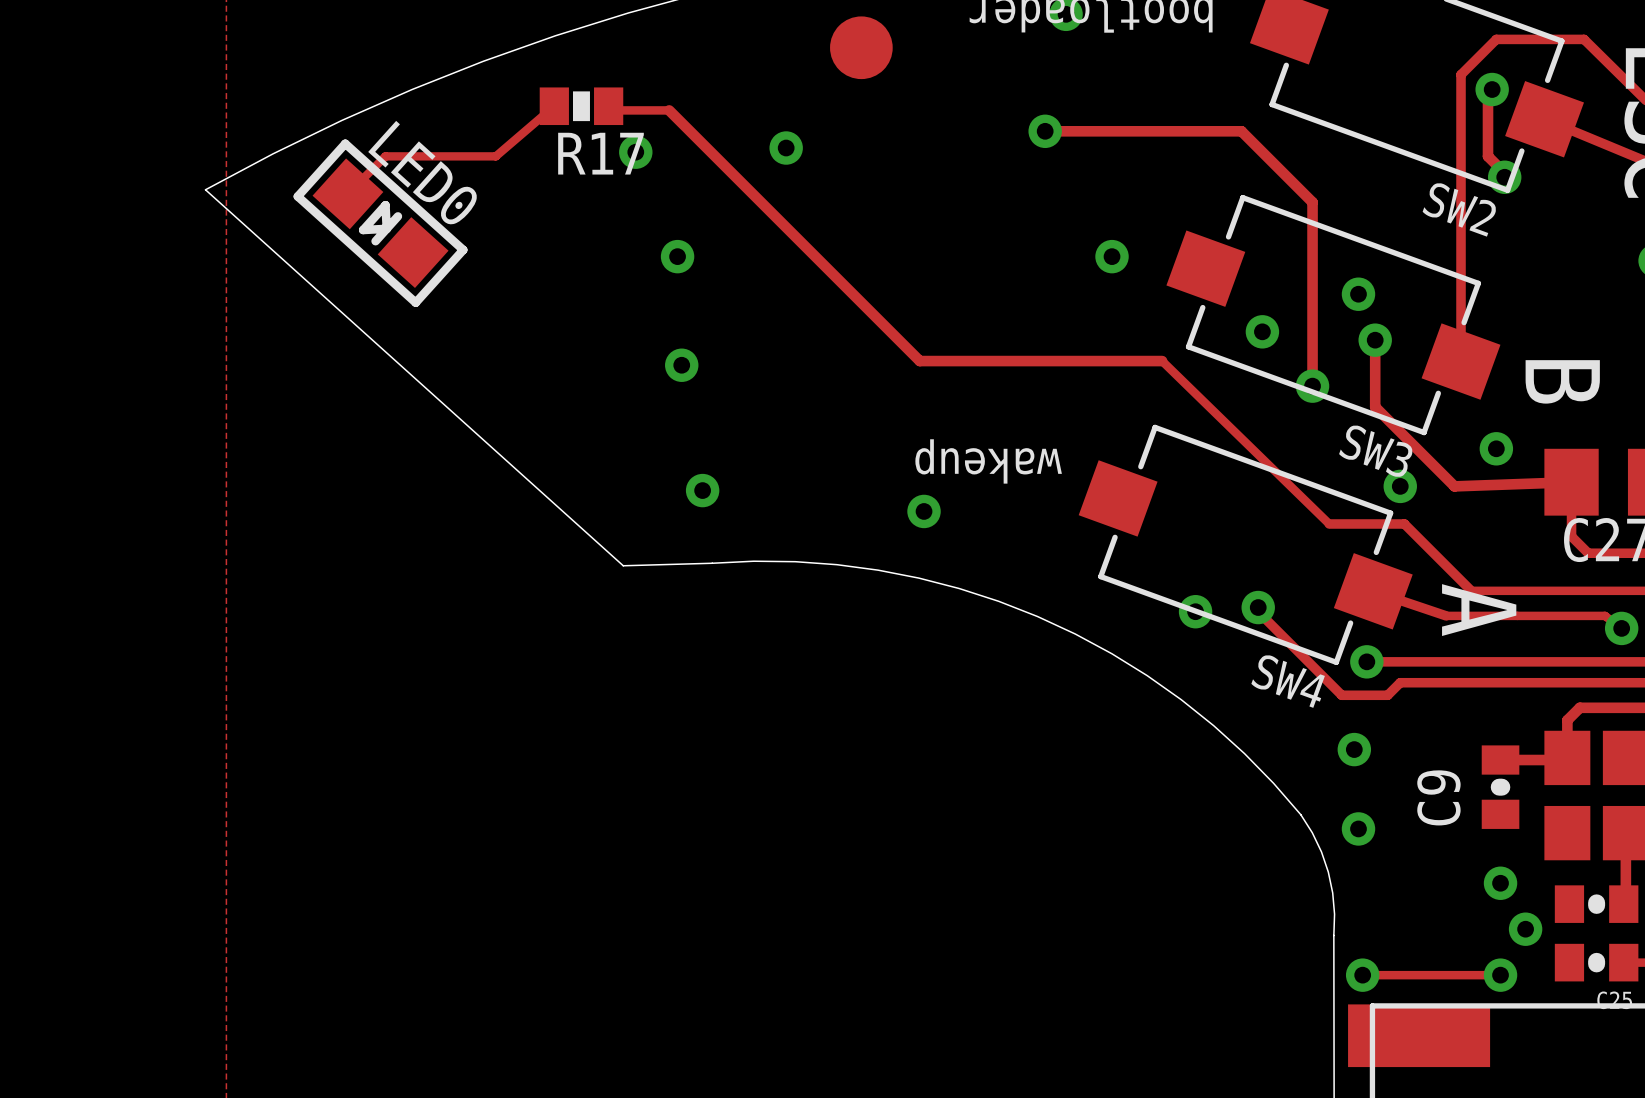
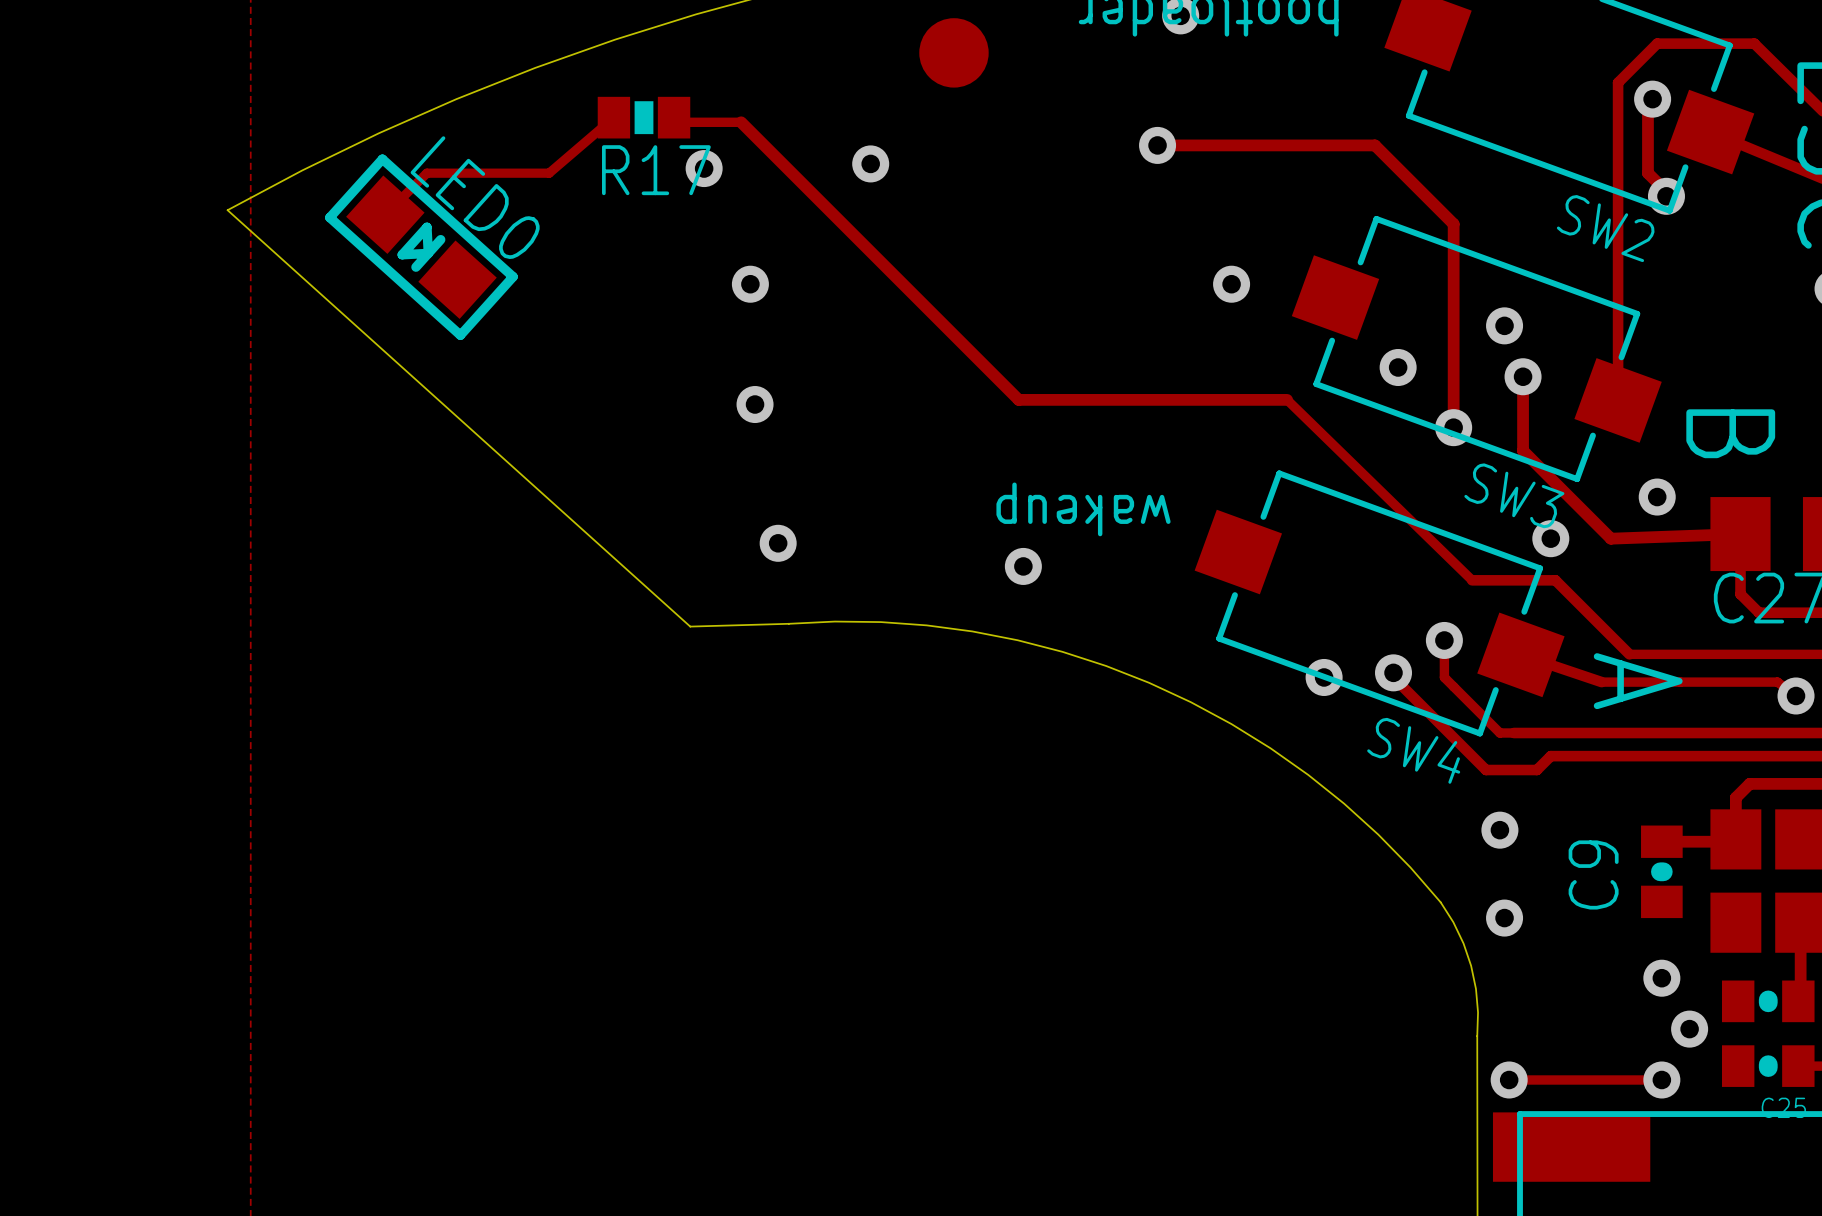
track: none -> (1444, 640) (1444, 677) (1499, 733) (1513, 733)
via position: (1366, 661) -> (1444, 640)

